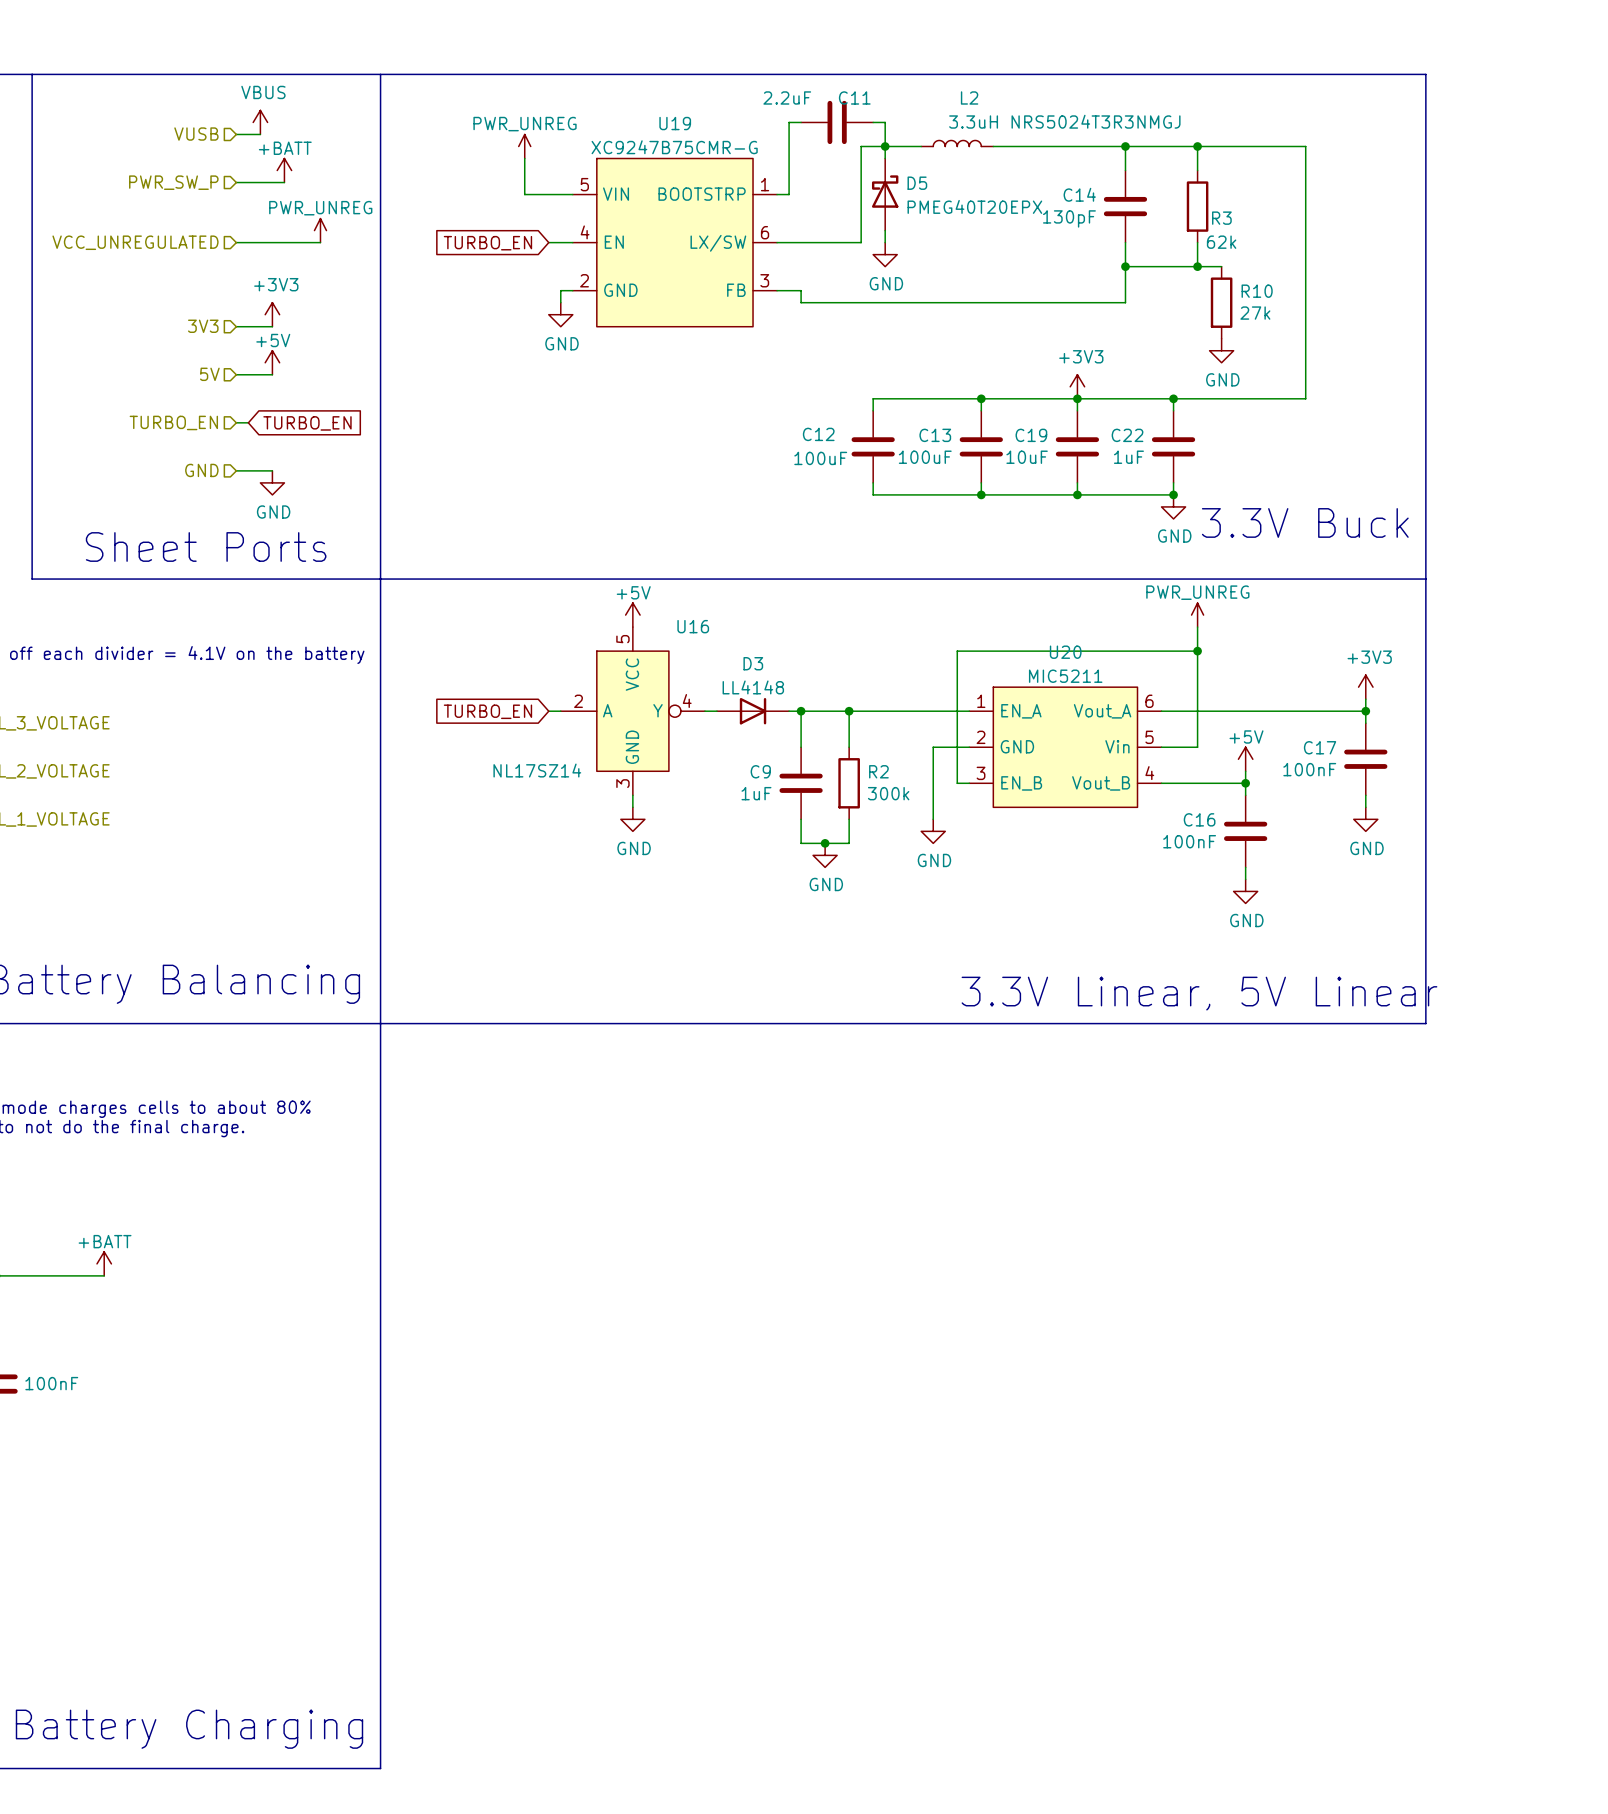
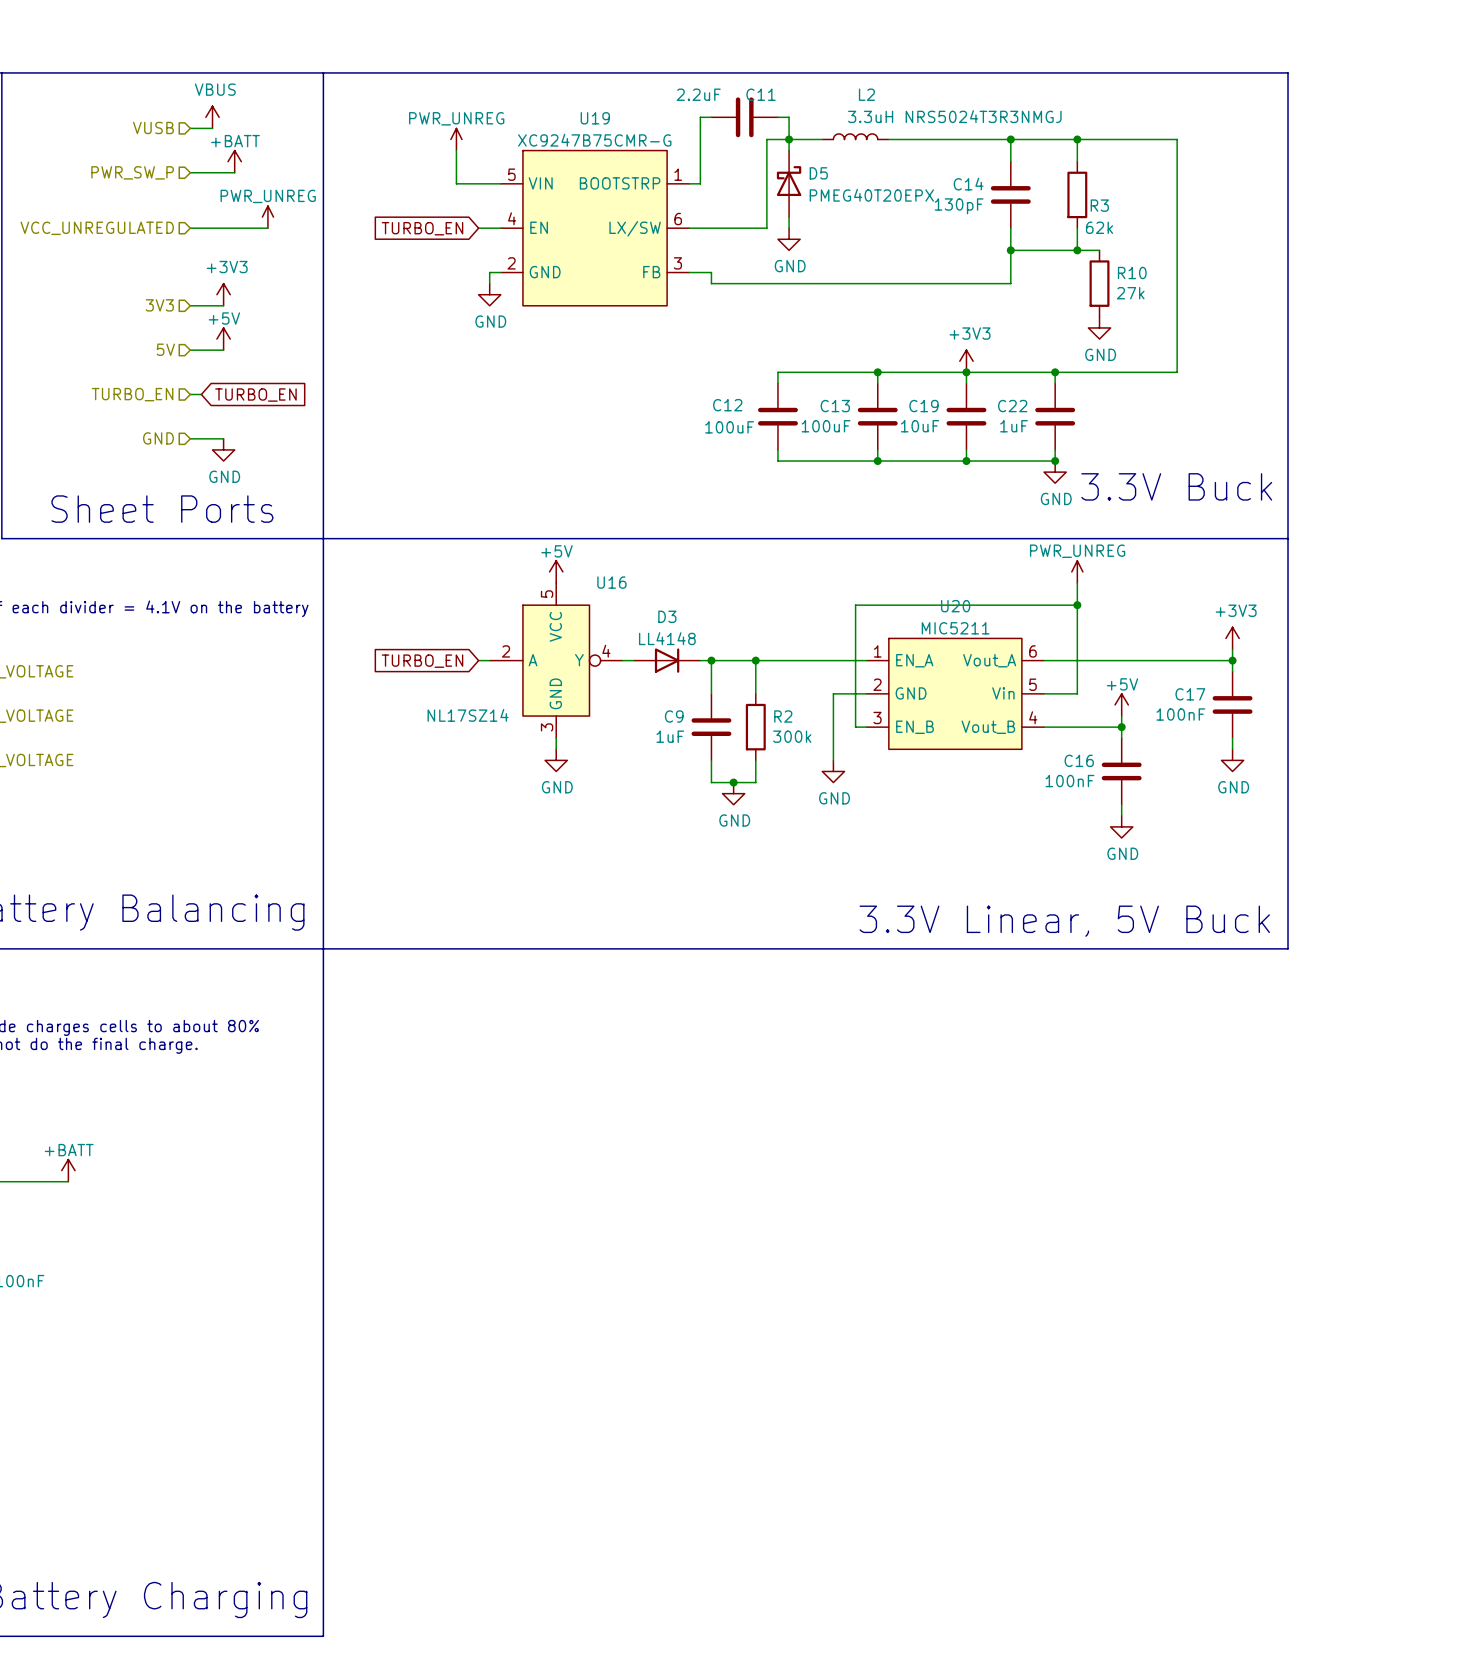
text: 3.3V Linear, 5V Linear (1199, 993) -> 3.3V Linear, 5V Buck (1064, 921)

